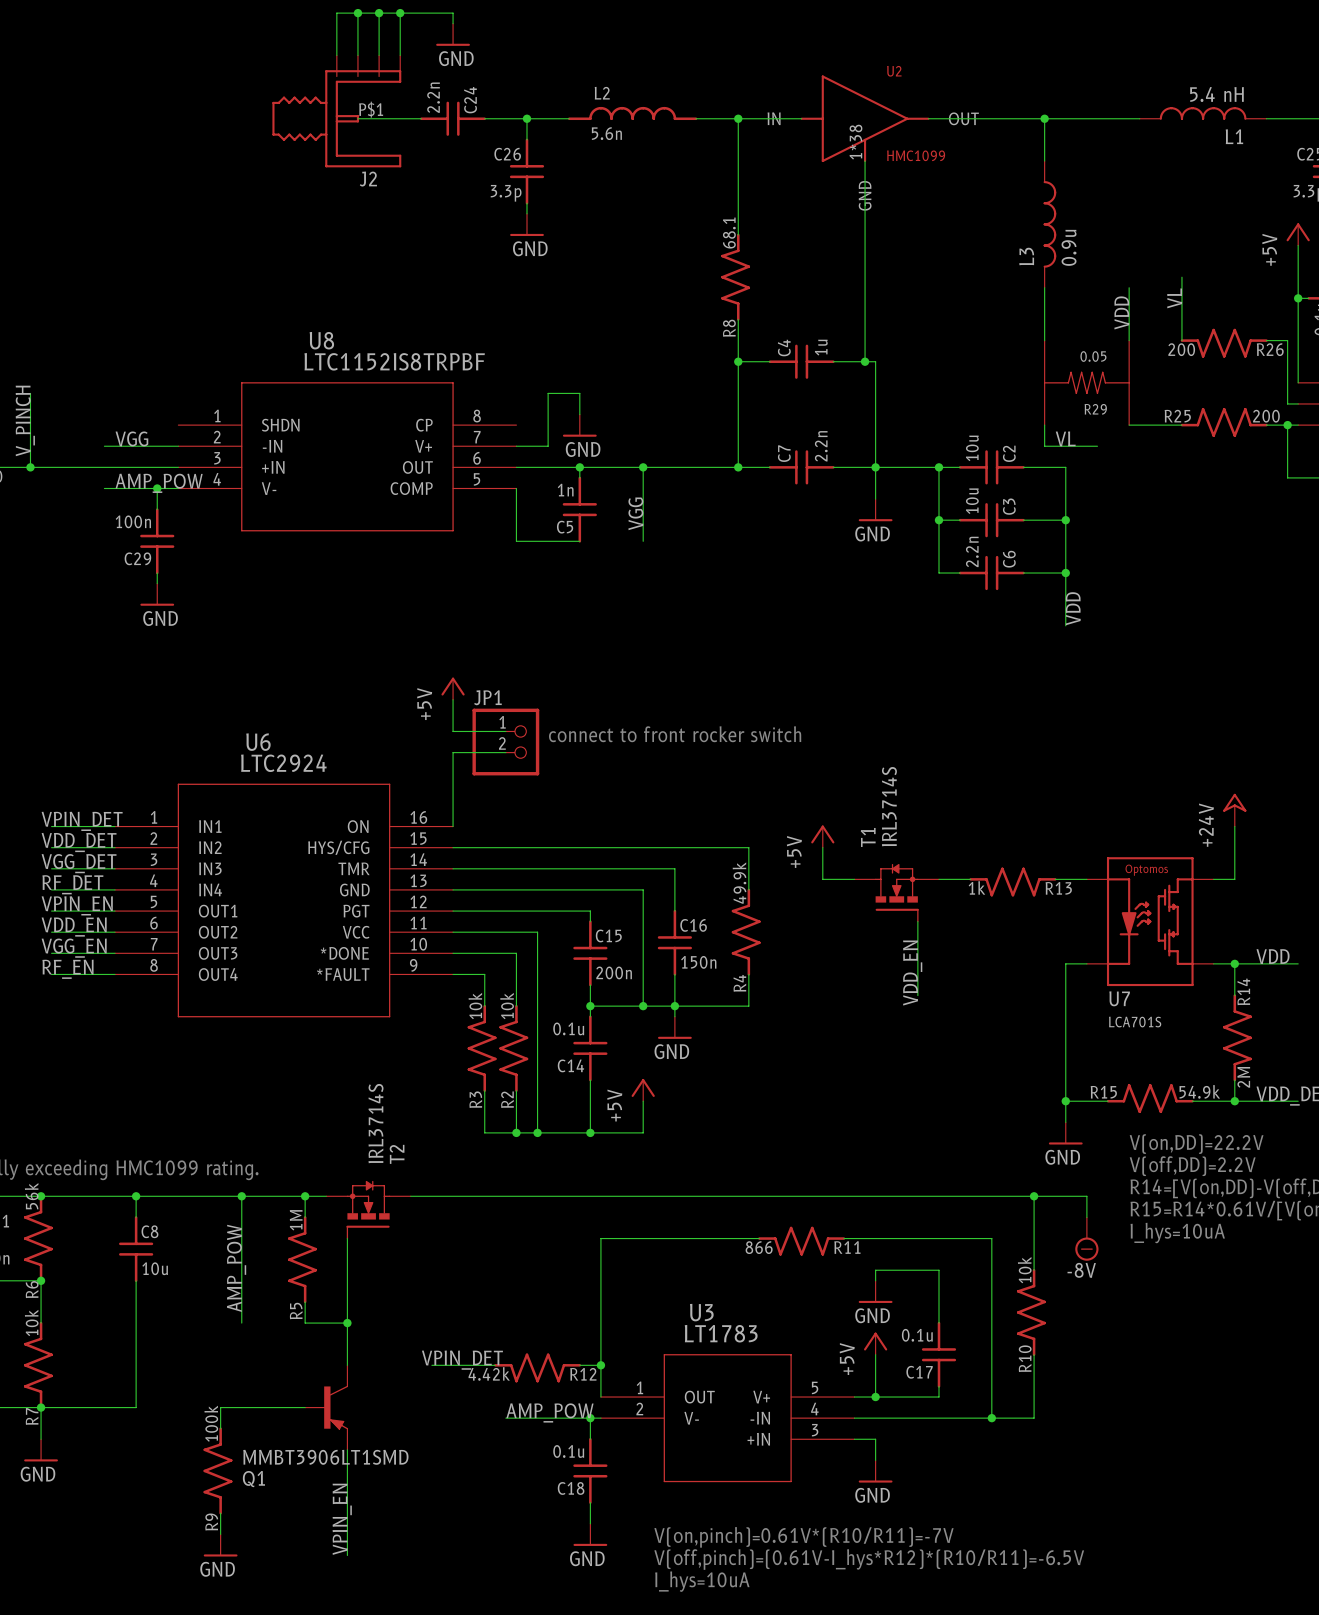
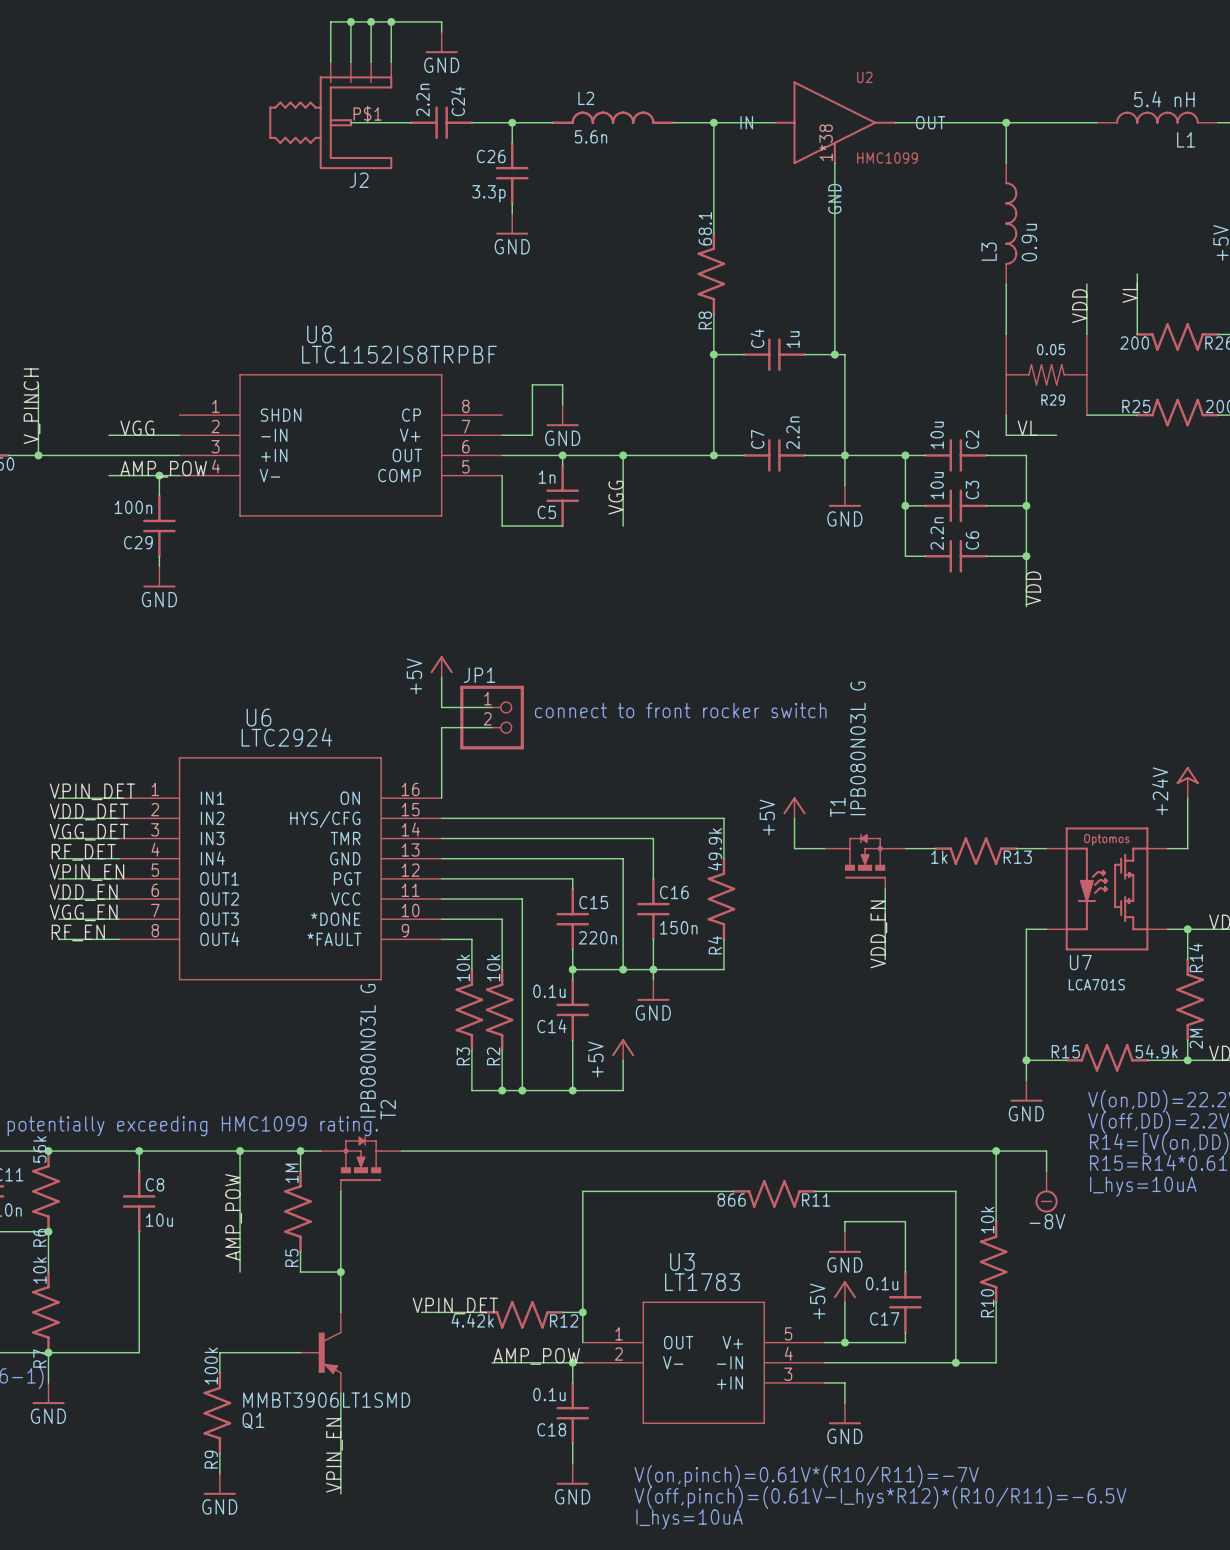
T1 value: IRL3714S (889, 806) -> IPB080N03L G (858, 748)
C15 value: 200n (614, 972) -> 220n (597, 937)
T2 value: IRL3714S (376, 1123) -> IPB080N03L G (368, 1050)

